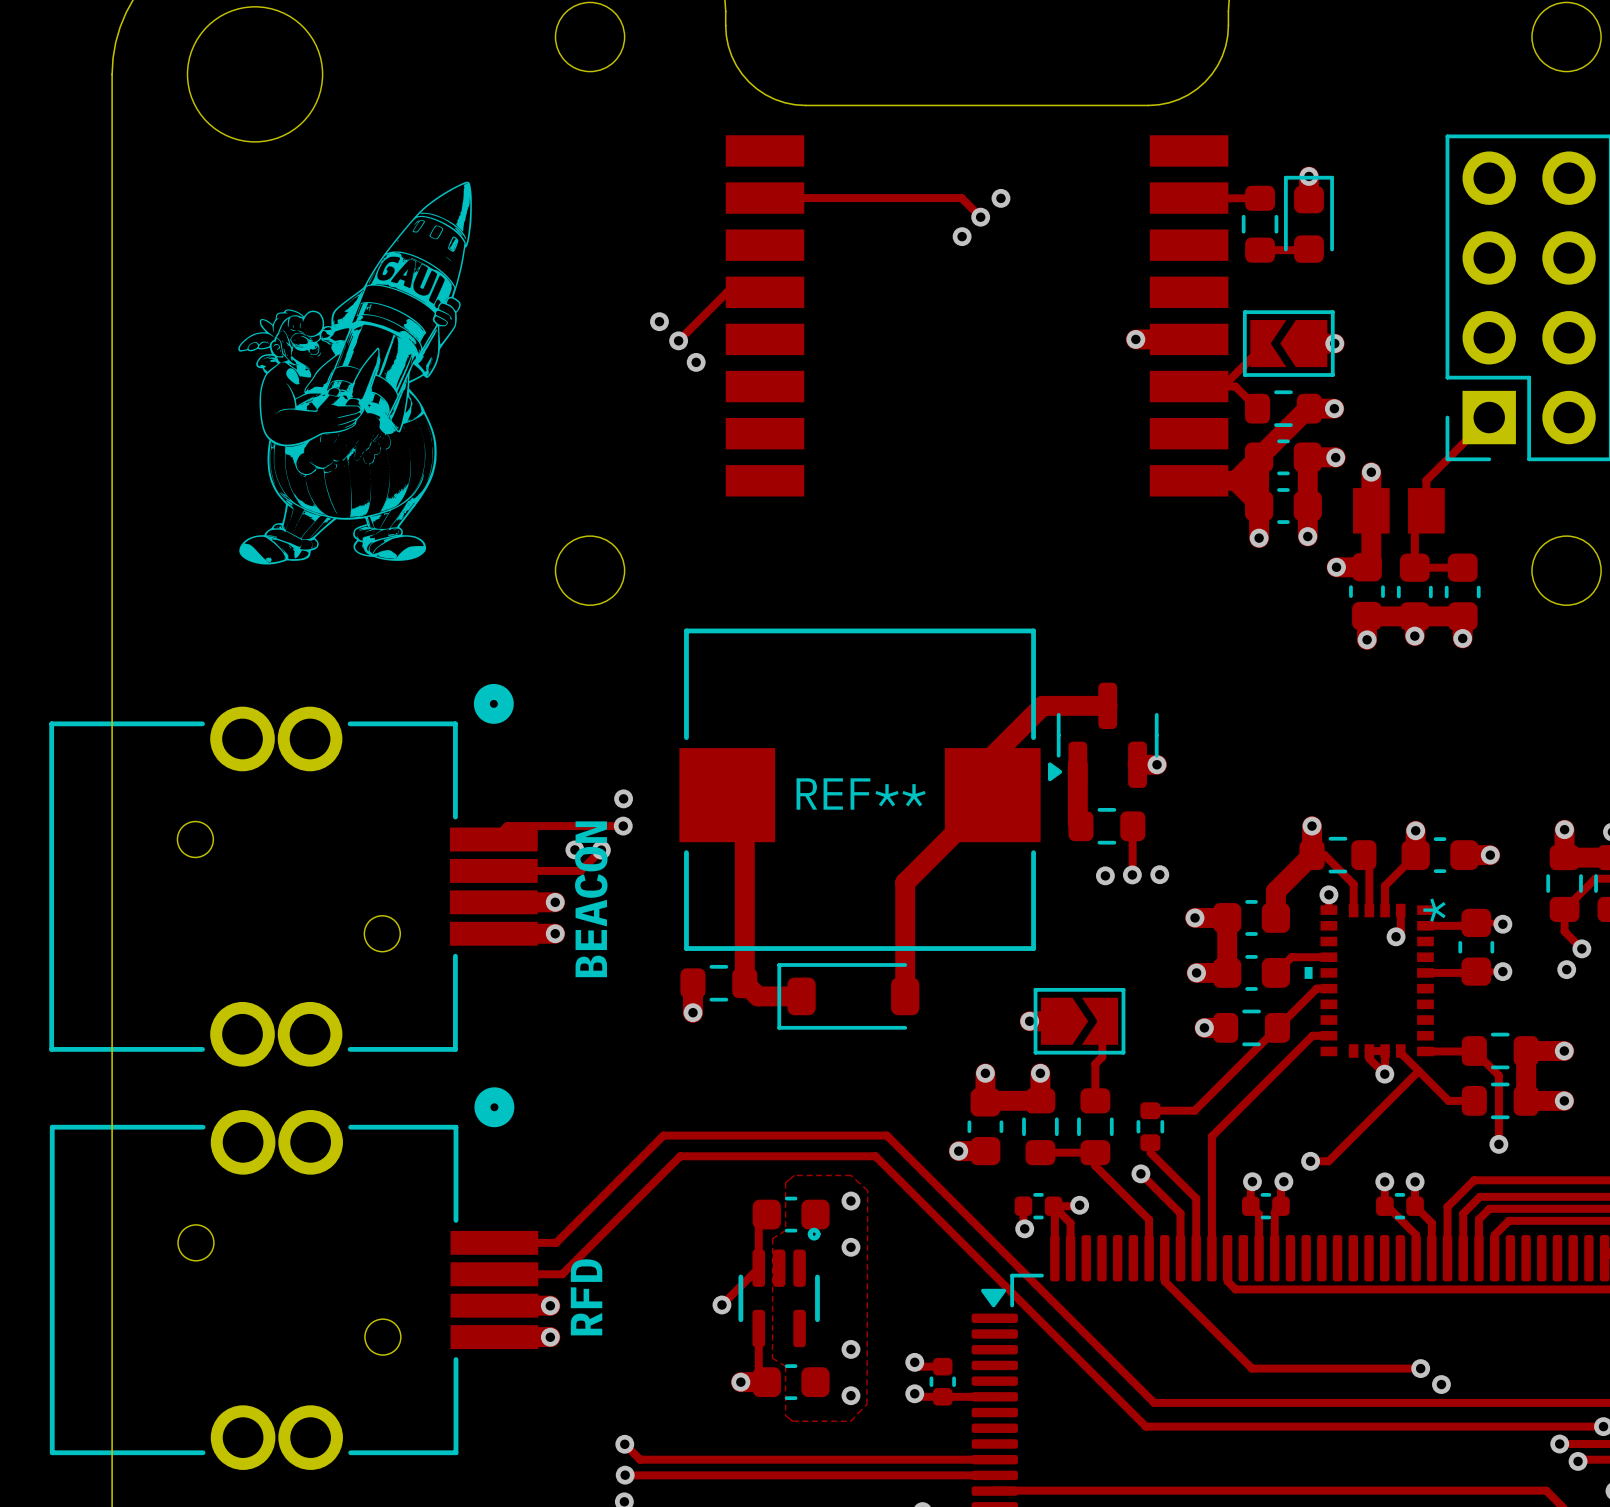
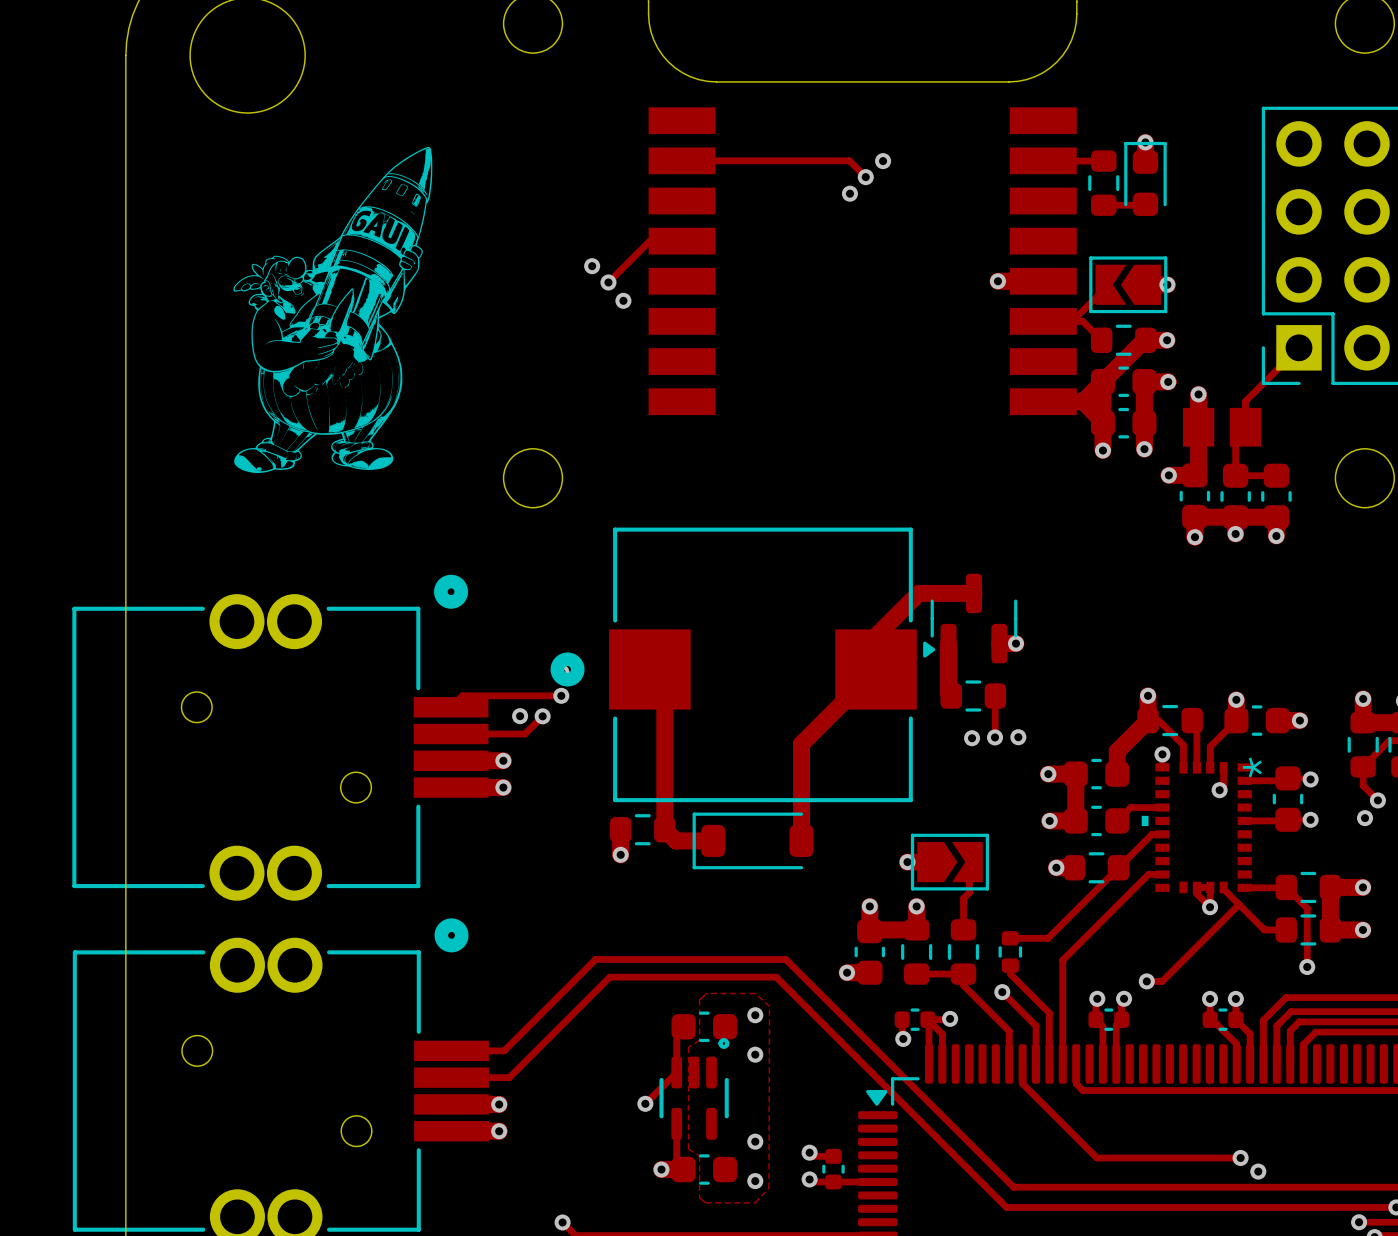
part: none -> (733, 664)
REF**: (860, 789) -> none
text: BEACON (591, 899) -> none
text: RFD (586, 1297) -> none

